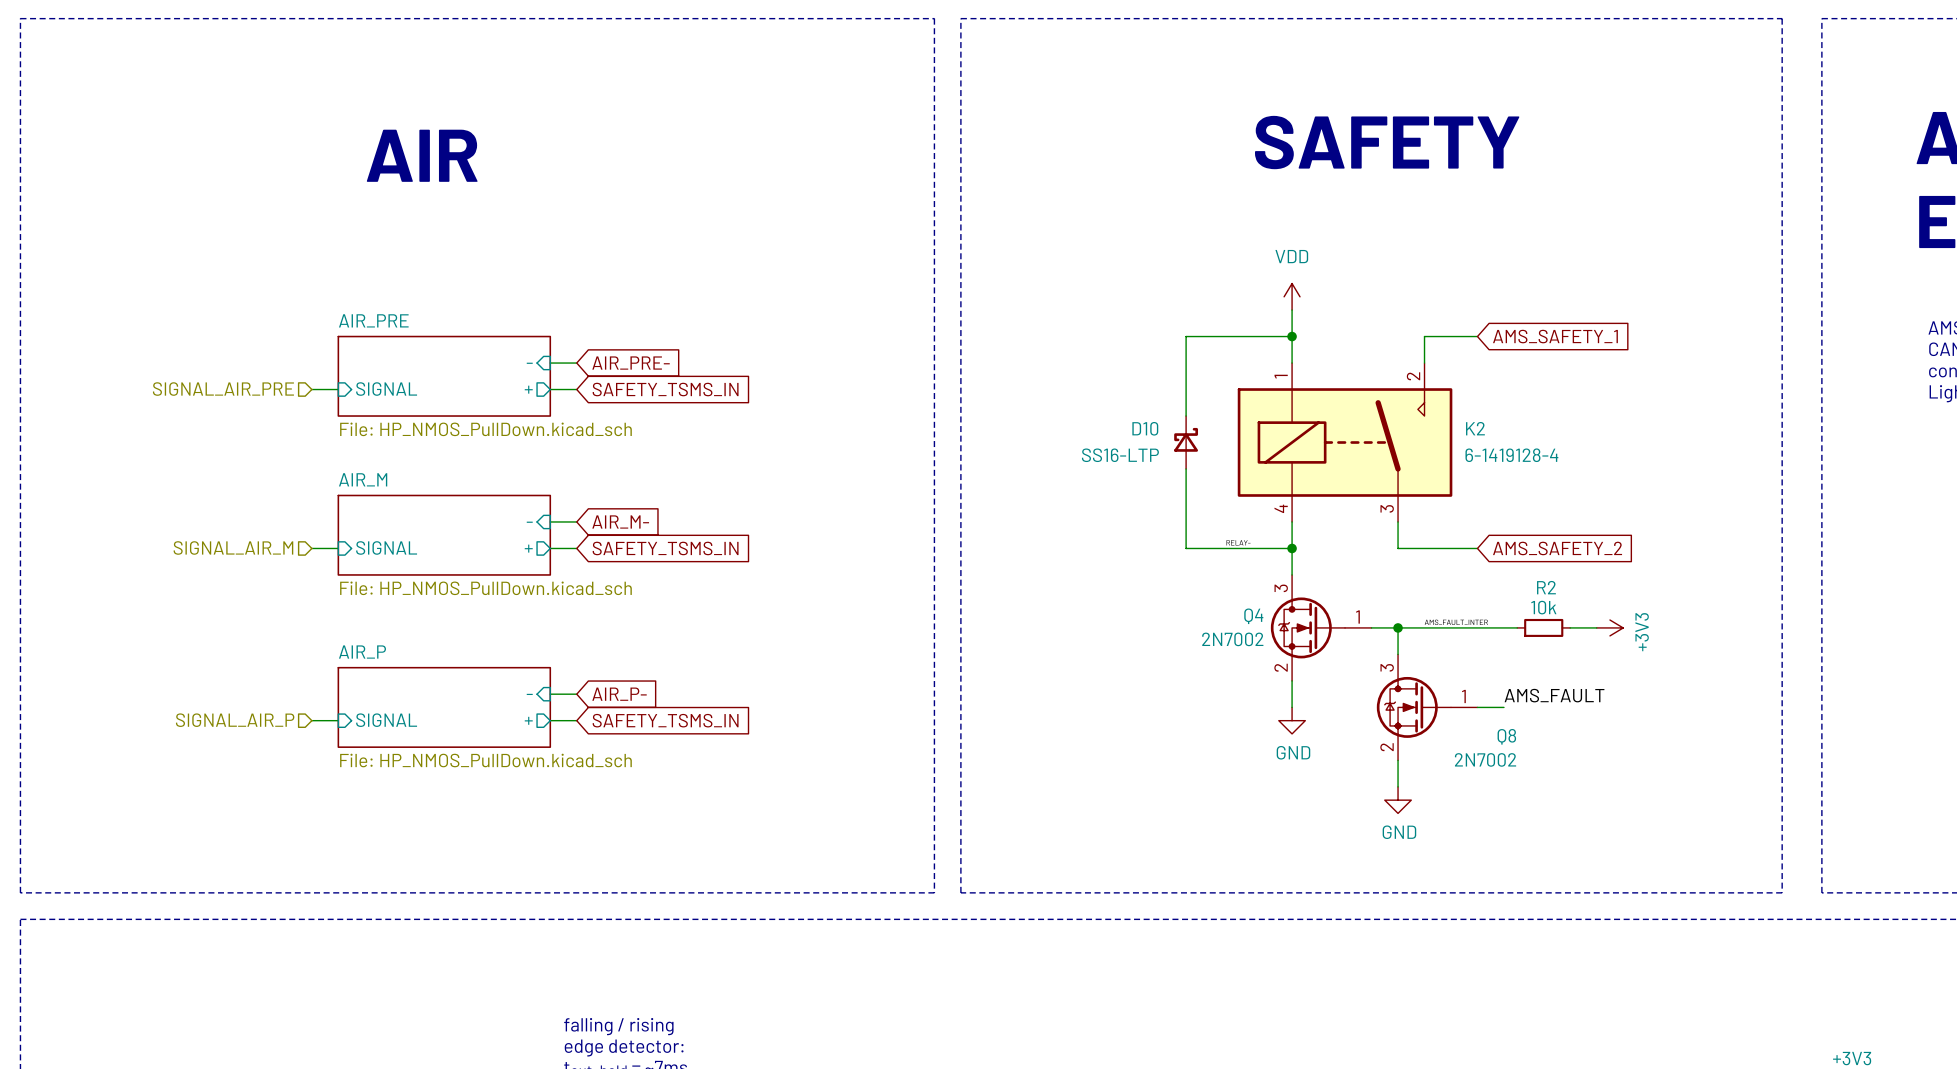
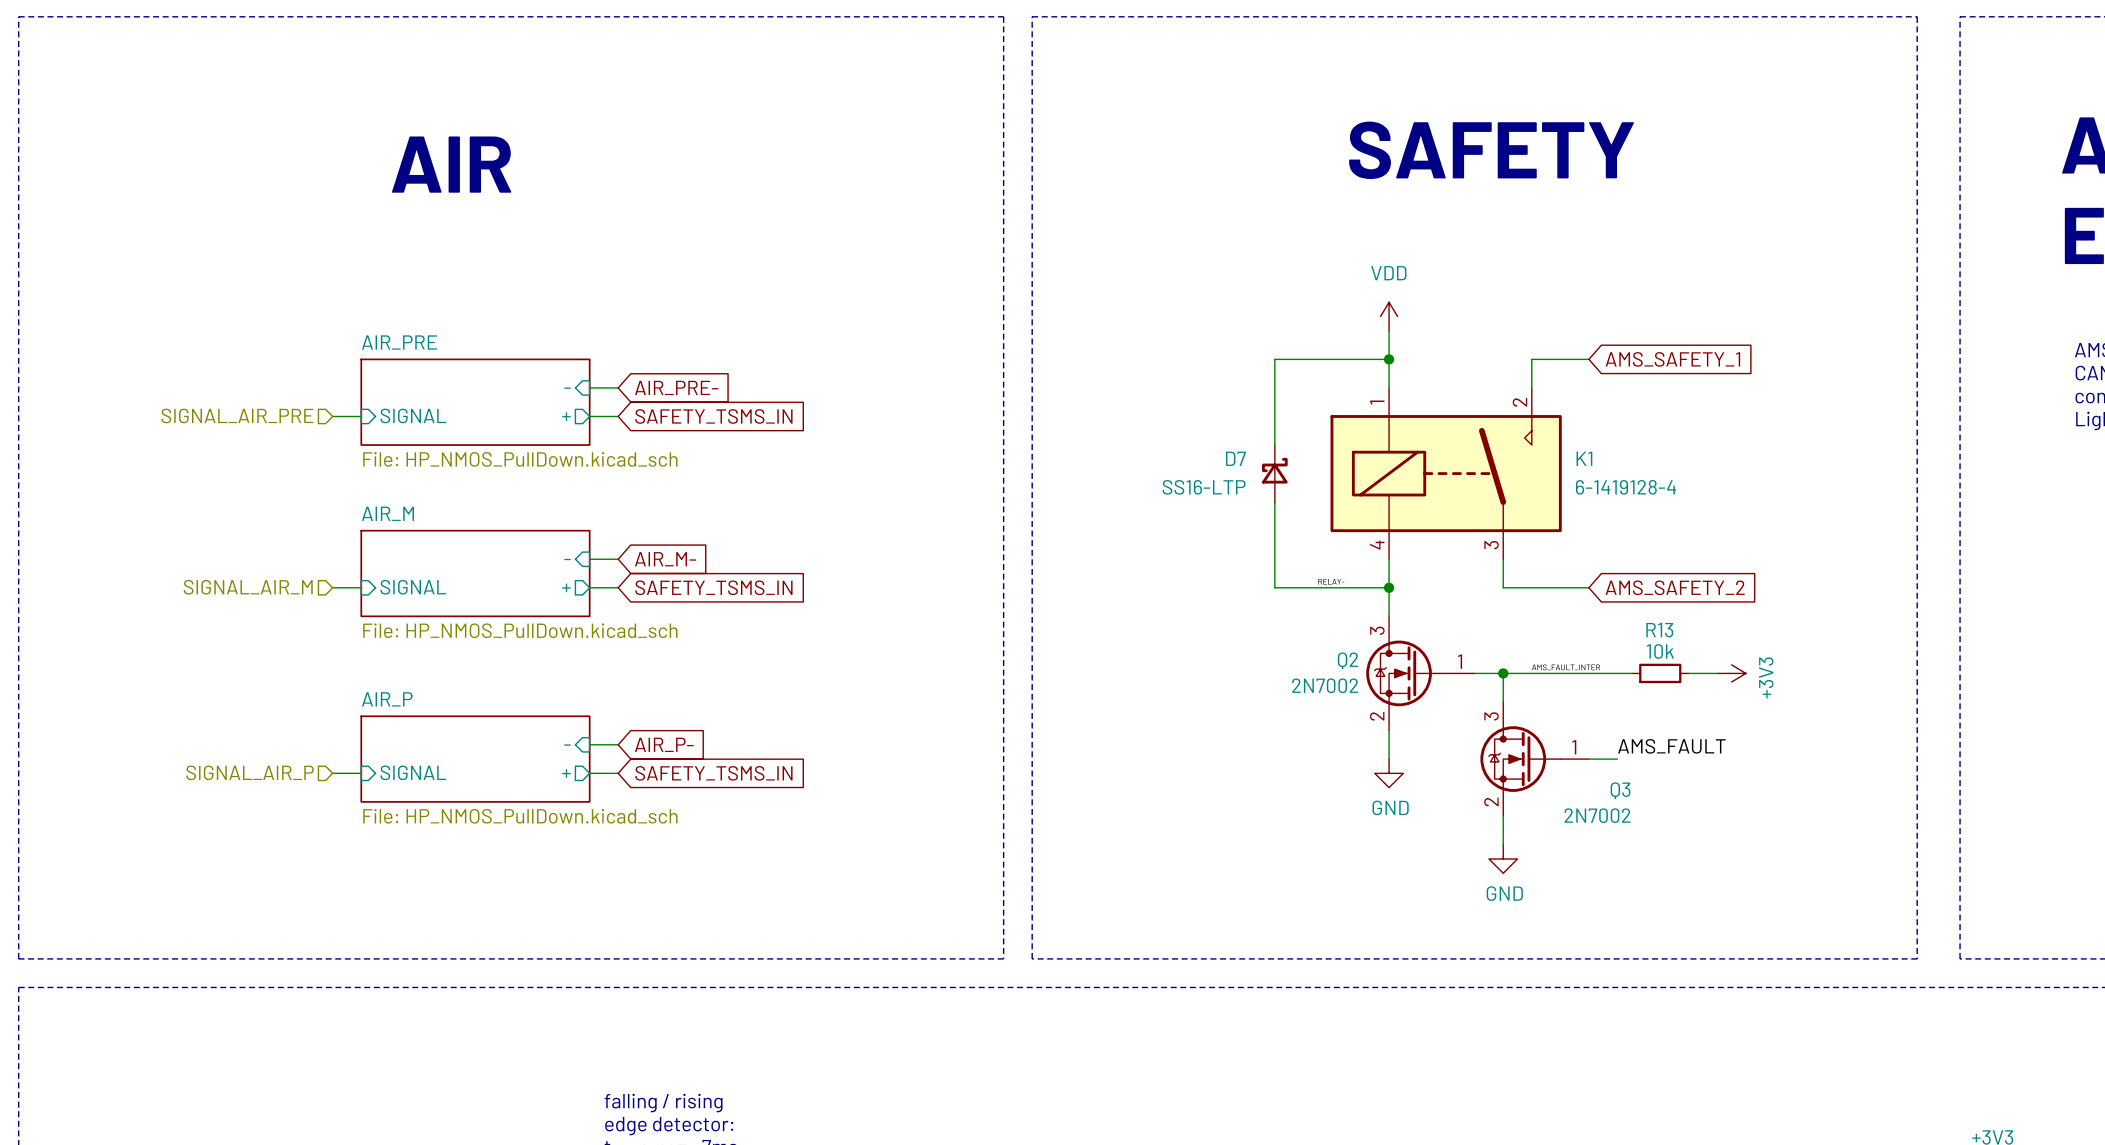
D10 name: D10 (1145, 428) -> D7 (1235, 458)
K2 name: K2 (1475, 428) -> K1 (1584, 458)
R2 name: R2 (1546, 587) -> R13 (1659, 630)
Q4 name: Q4 (1253, 616) -> Q2 (1348, 660)
Q8 name: Q8 (1506, 736) -> Q3 (1620, 790)

